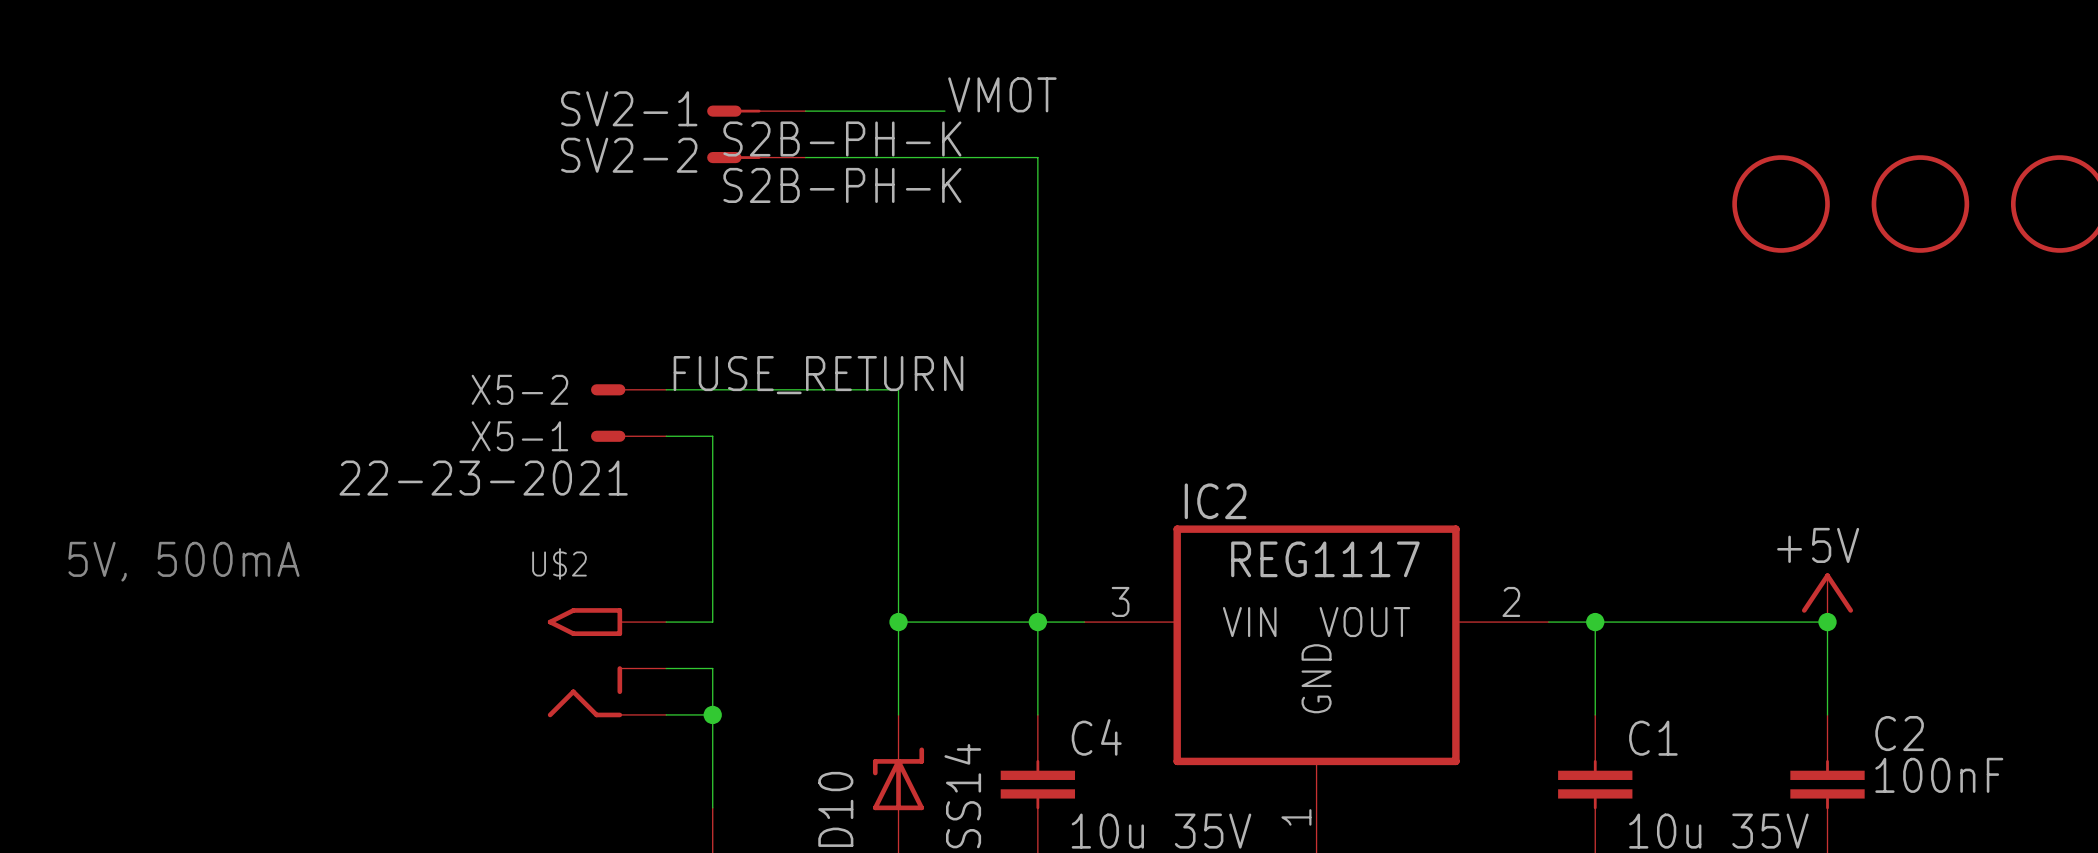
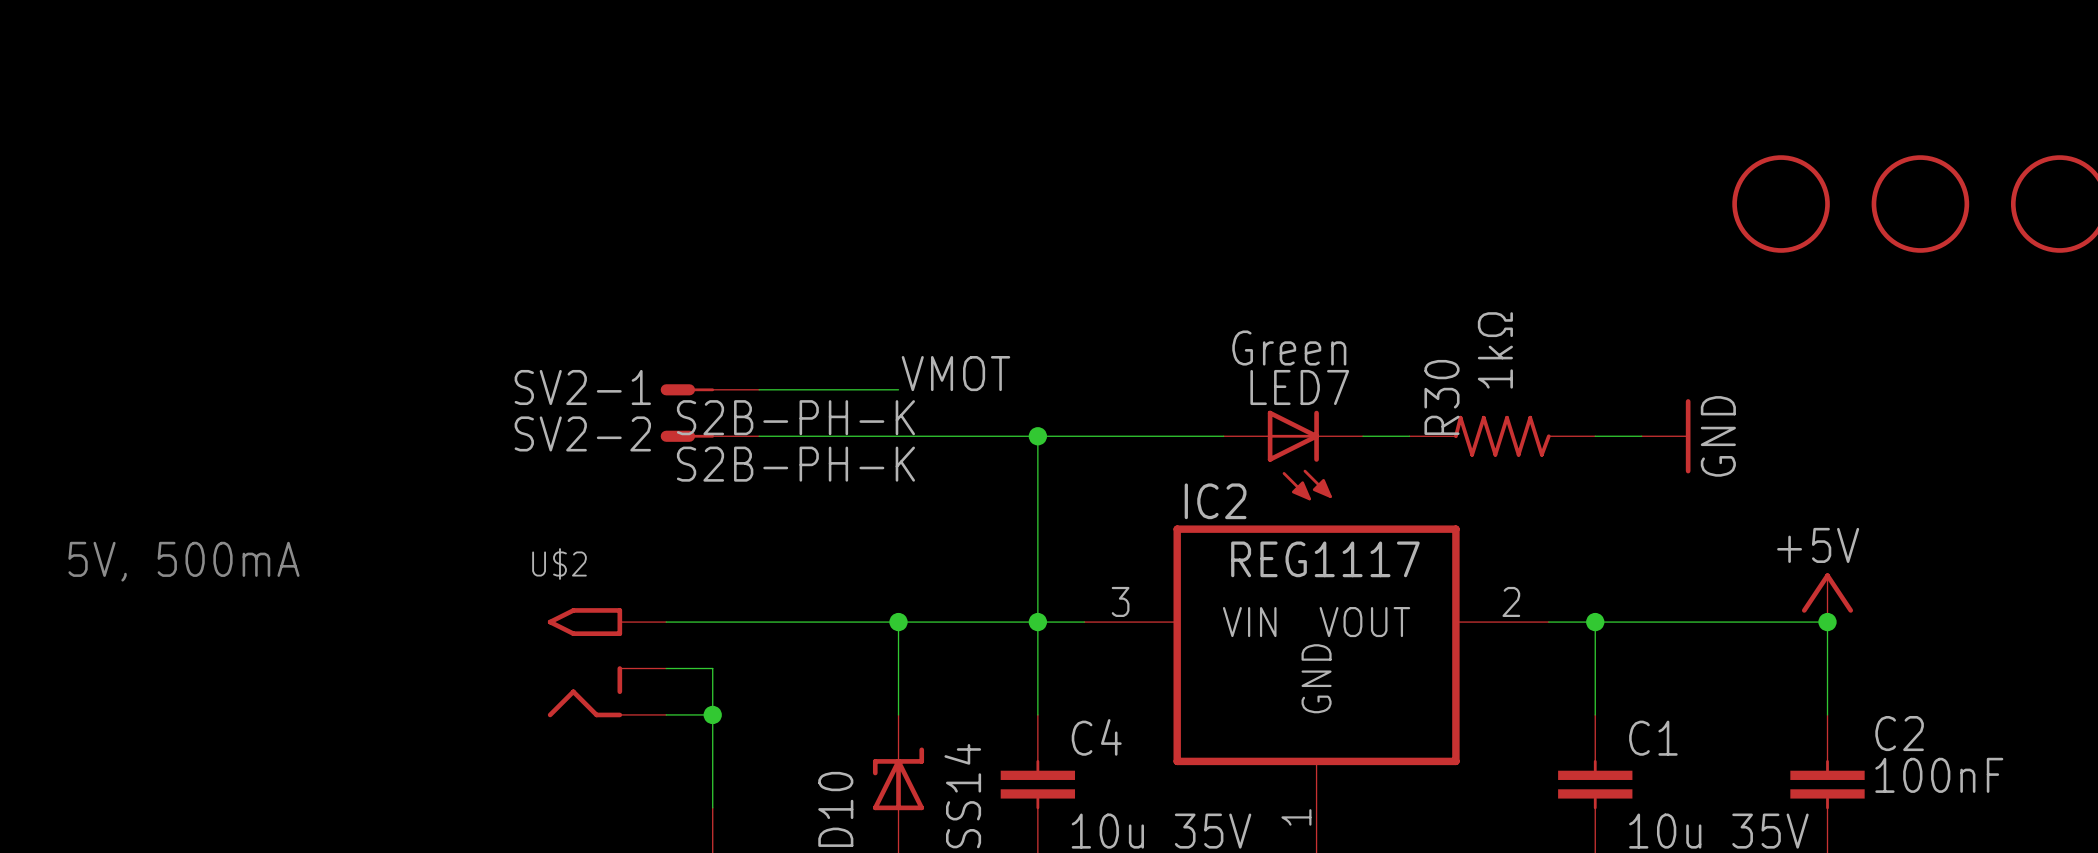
label position: VMOT (1002, 94) -> VMOT (955, 373)
SV2-1 position: (756, 111) -> (709, 389)
wire: (805, 111) (944, 111) -> none
SV2-2 position: (756, 157) -> (709, 436)
wire: (805, 157) (1037, 157) (1037, 436) -> none
label: FUSE_RETURN (818, 375) -> none
X5-2: (628, 389) -> none
wire: (898, 389) (898, 622) -> none
X5-1: 22-23-2021 (628, 436) -> none
wire: (666, 436) (712, 436) (712, 622) -> (898, 622) (712, 622)
wire: none -> (759, 436) (1223, 436)
junction: none -> (1037, 436)
wire: none -> (1363, 436) (1409, 436)
R30: none -> 1kΩ (1502, 436)
wire: none -> (1595, 436) (1641, 436)
power symbol: none -> GND (1666, 436)
LED7: none -> Green (1293, 455)

